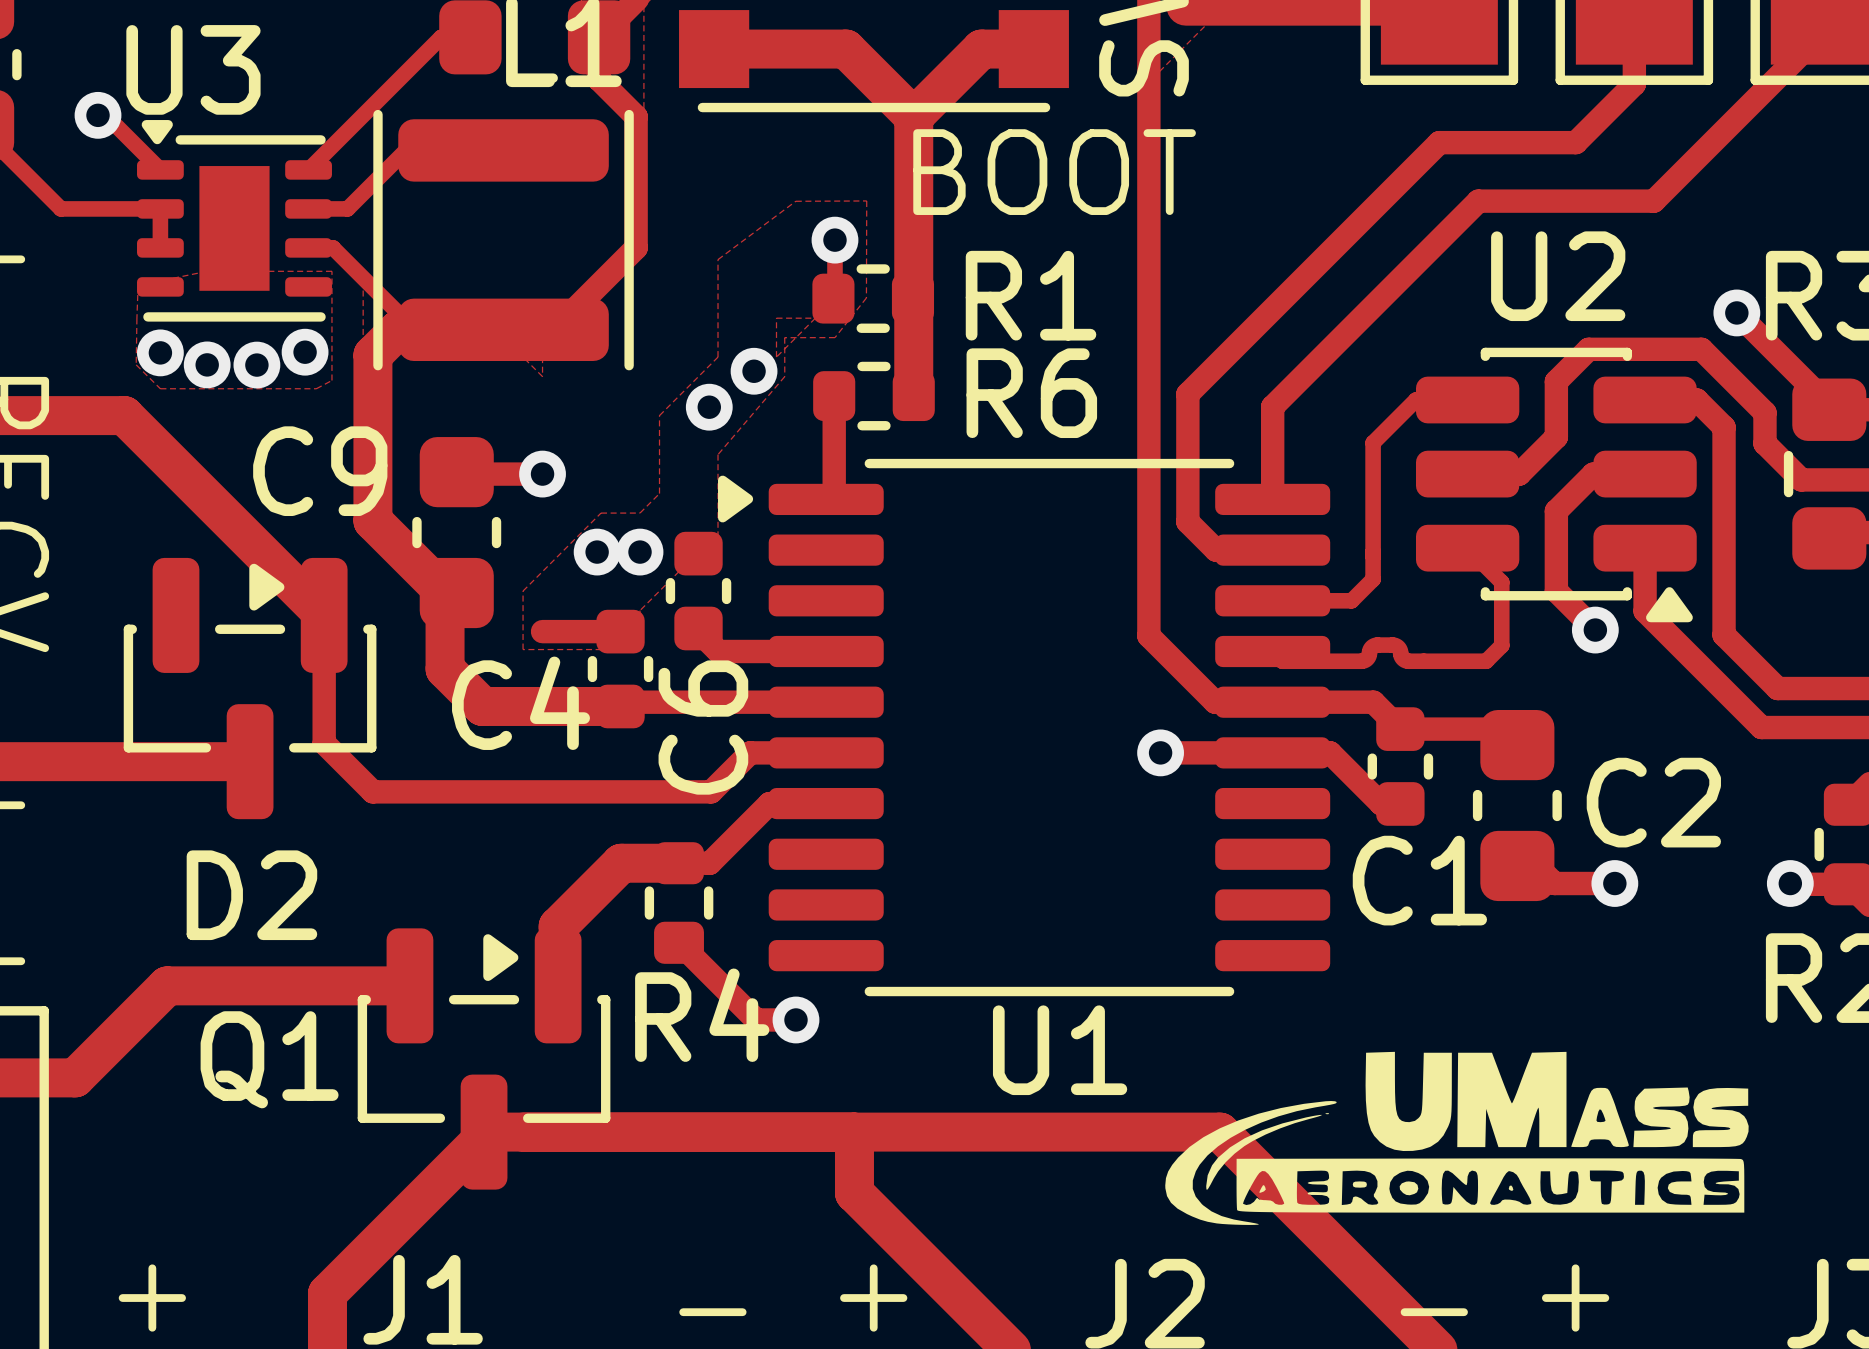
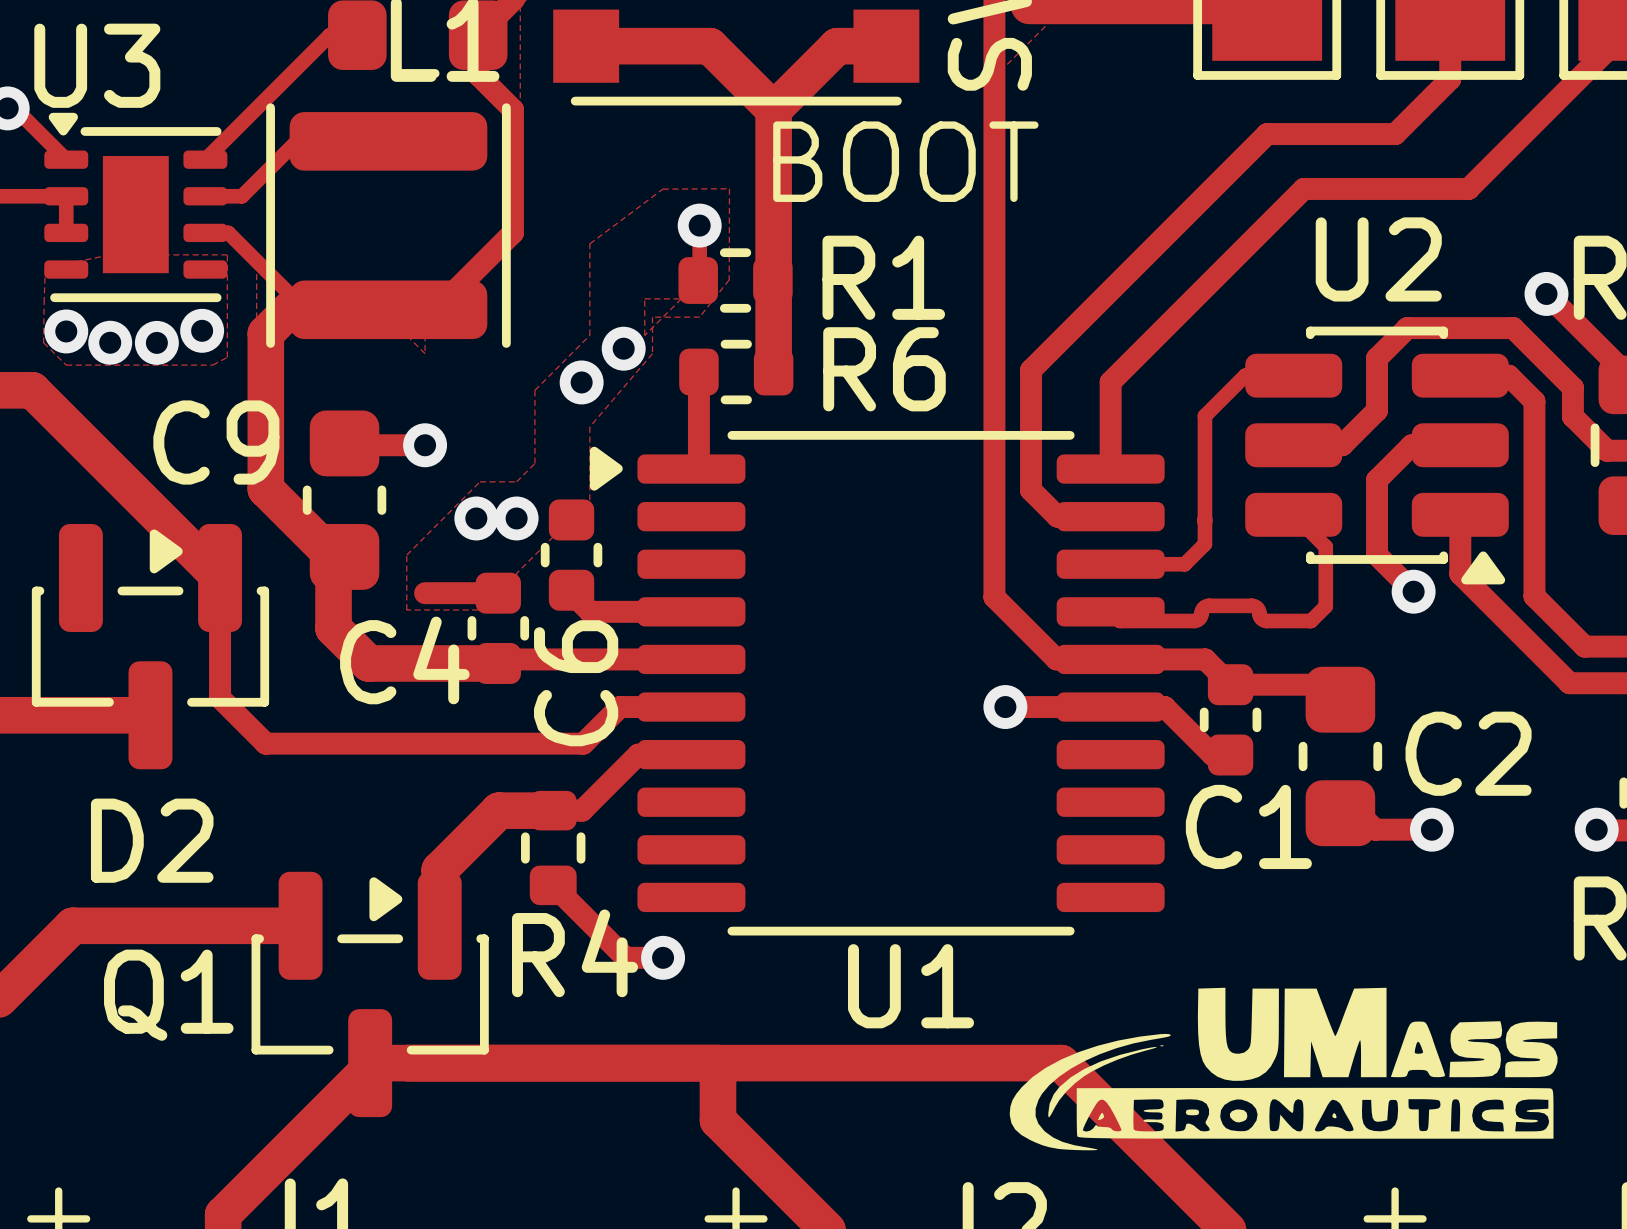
top track: (1392, 645) (1398, 648) (1401, 657) (1406, 660) (1439, 661) -> (1223, 605) (1254, 606) (1258, 609) (1261, 618) (1266, 621)

